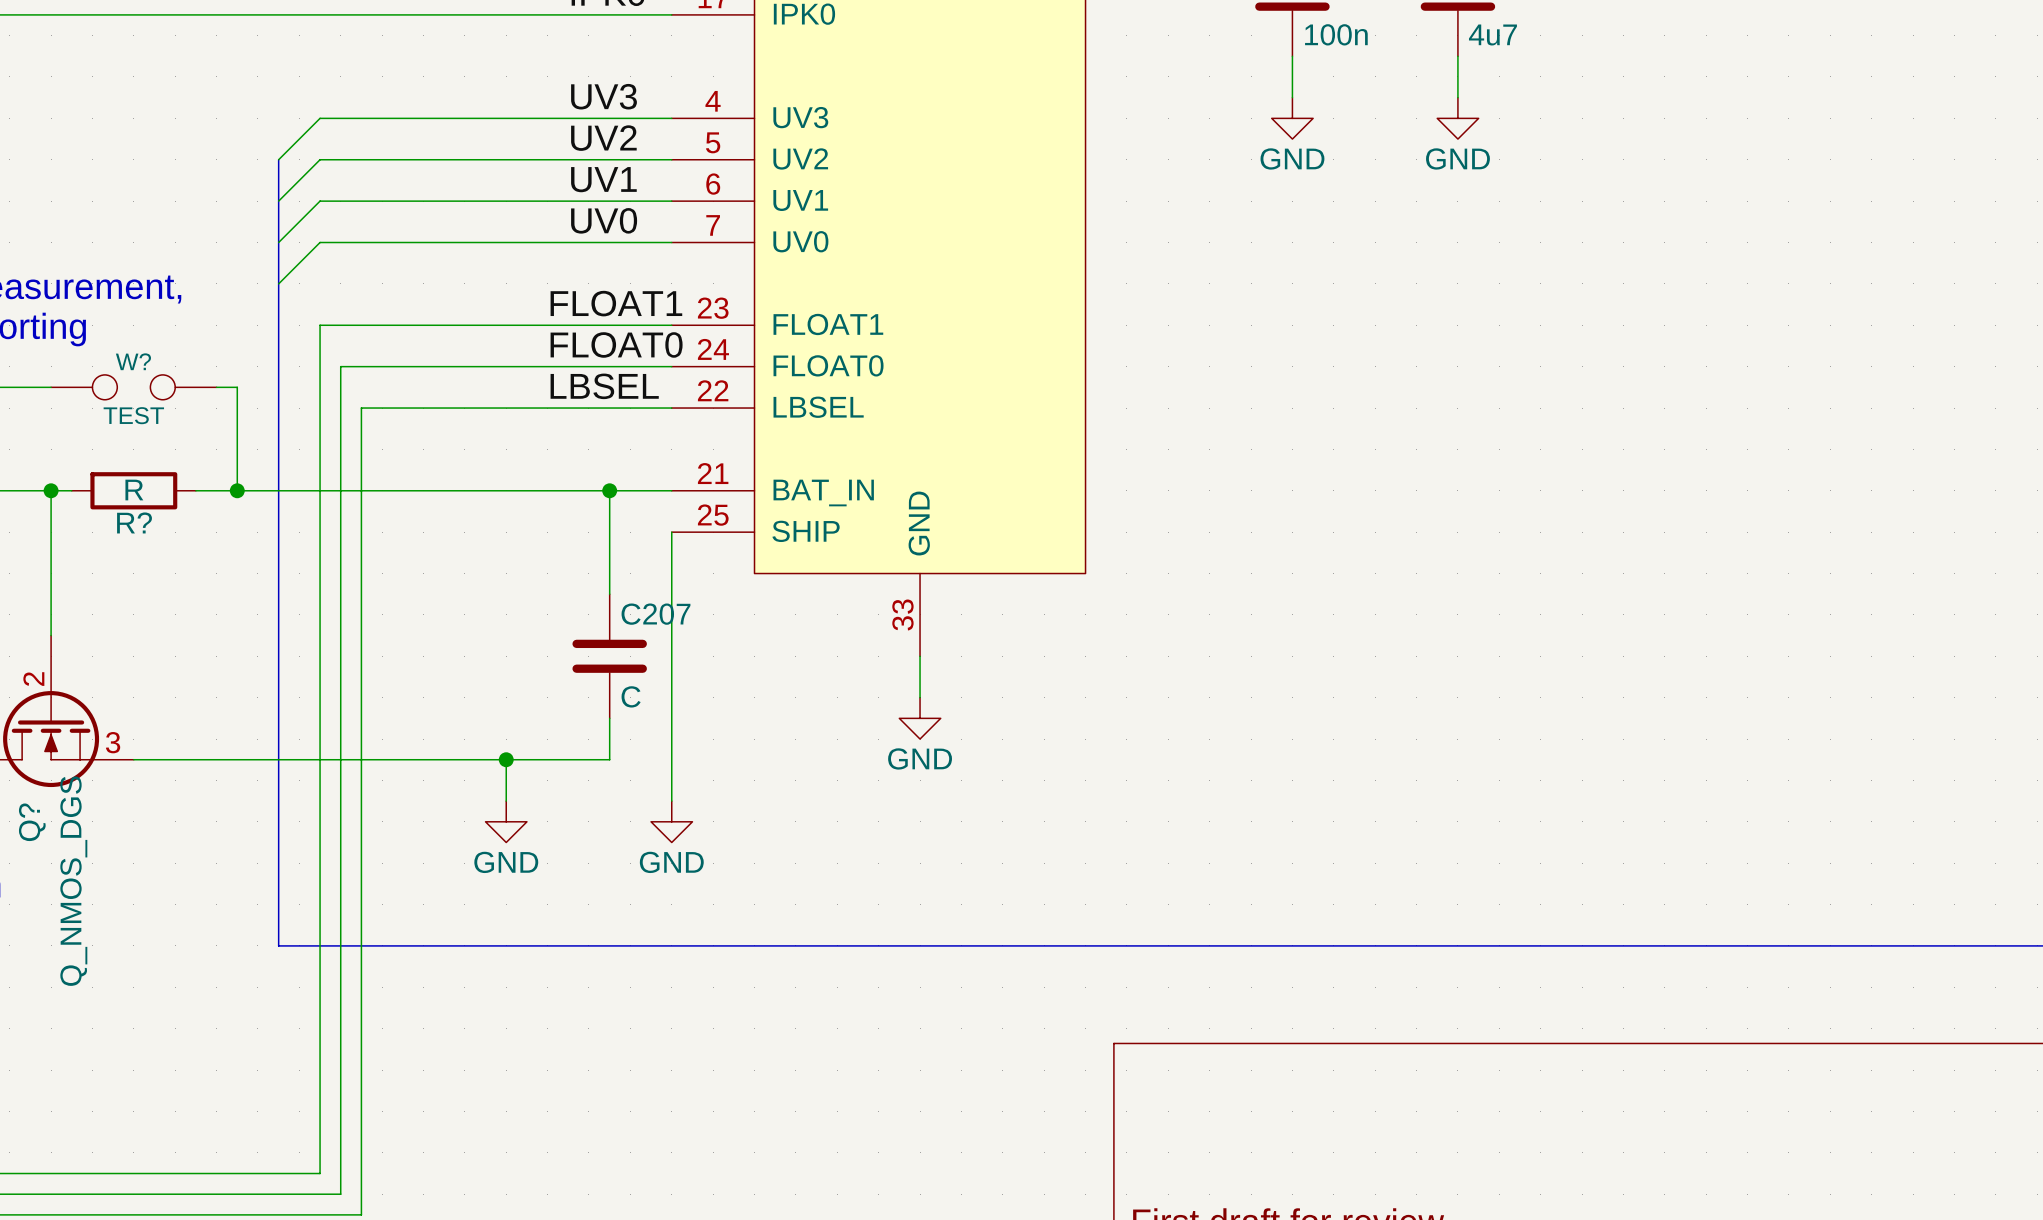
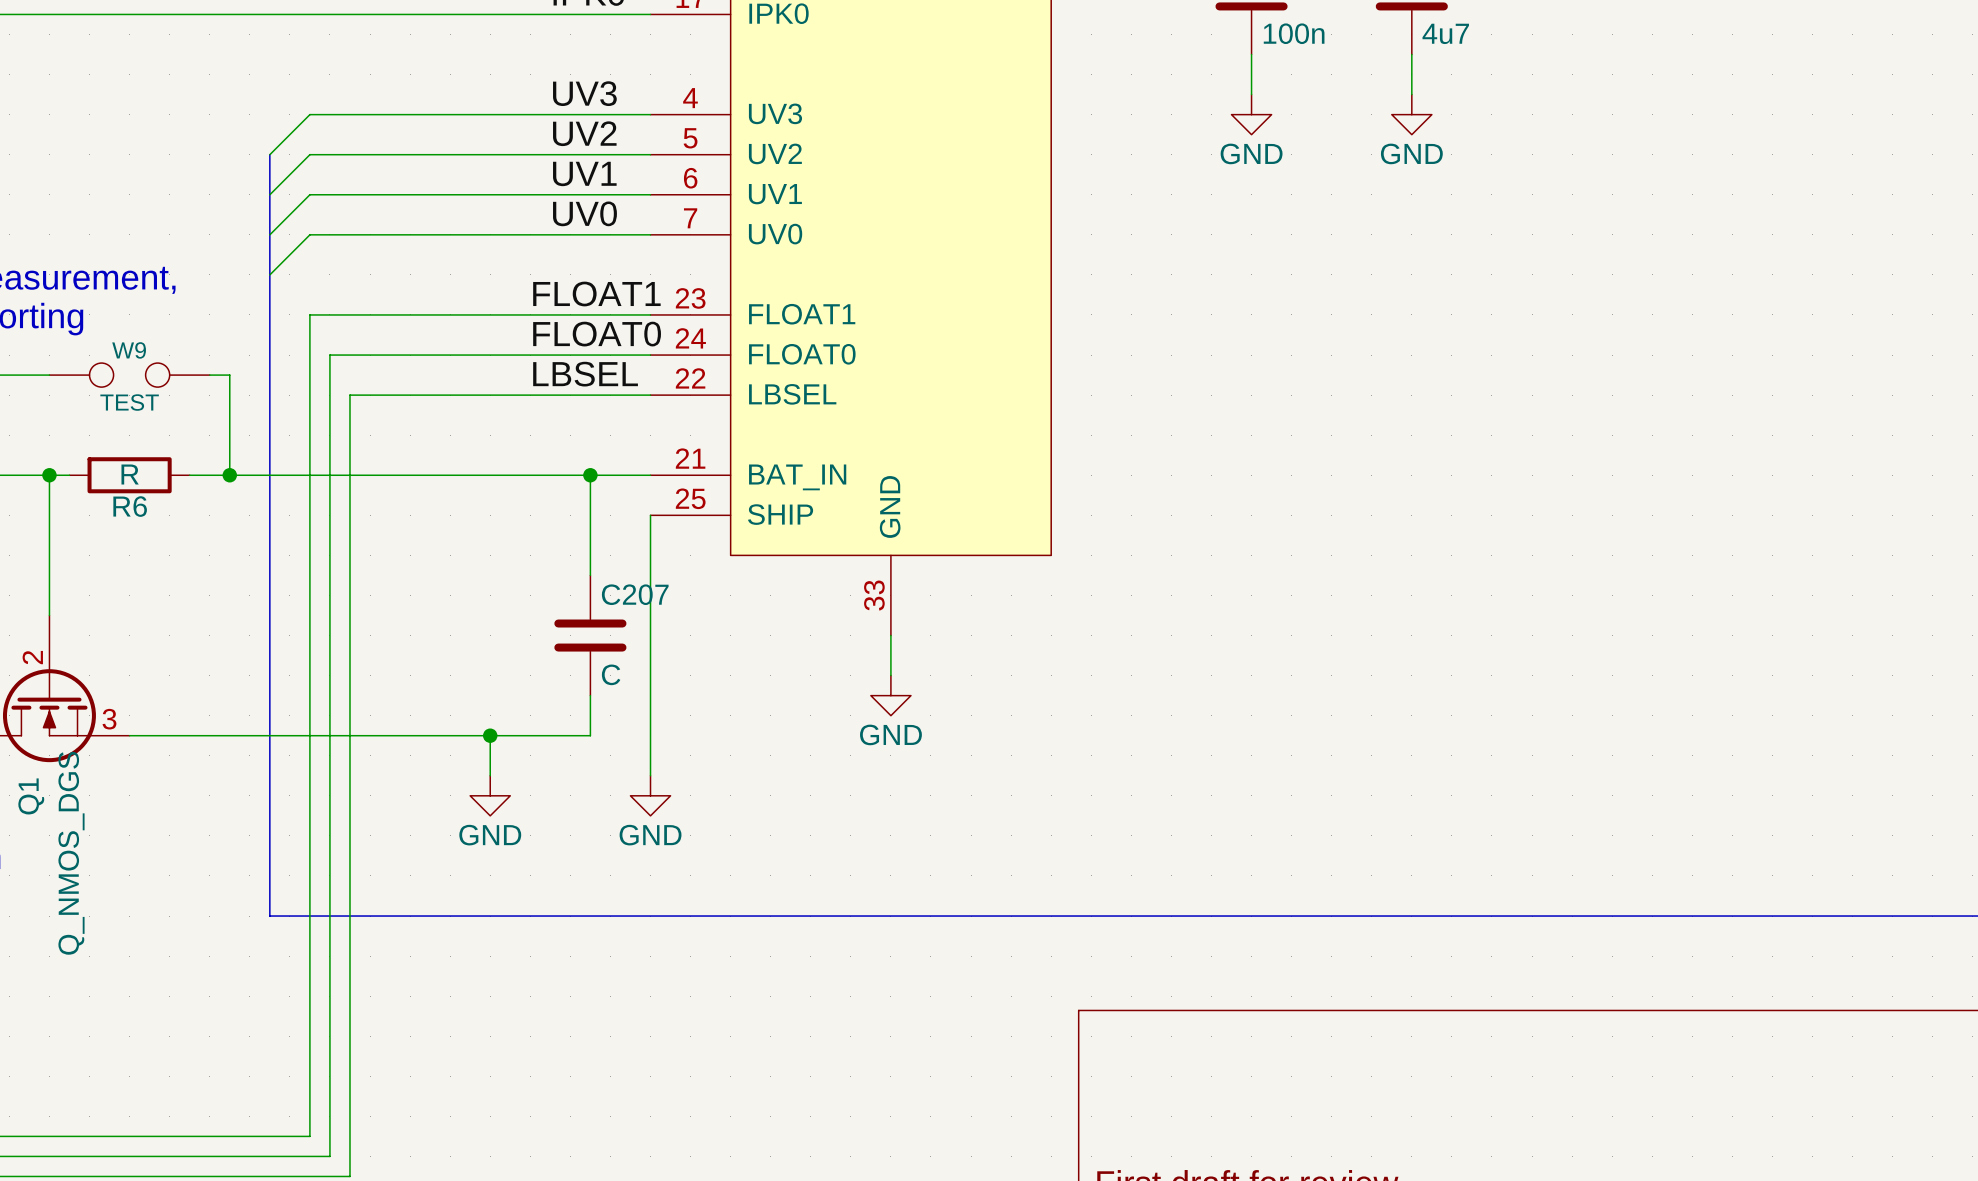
W? name: W? (133, 361) -> W9 (129, 350)
R? name: R? (134, 522) -> R6 (130, 506)
Q? name: Q? (32, 822) -> Q1 (31, 796)

